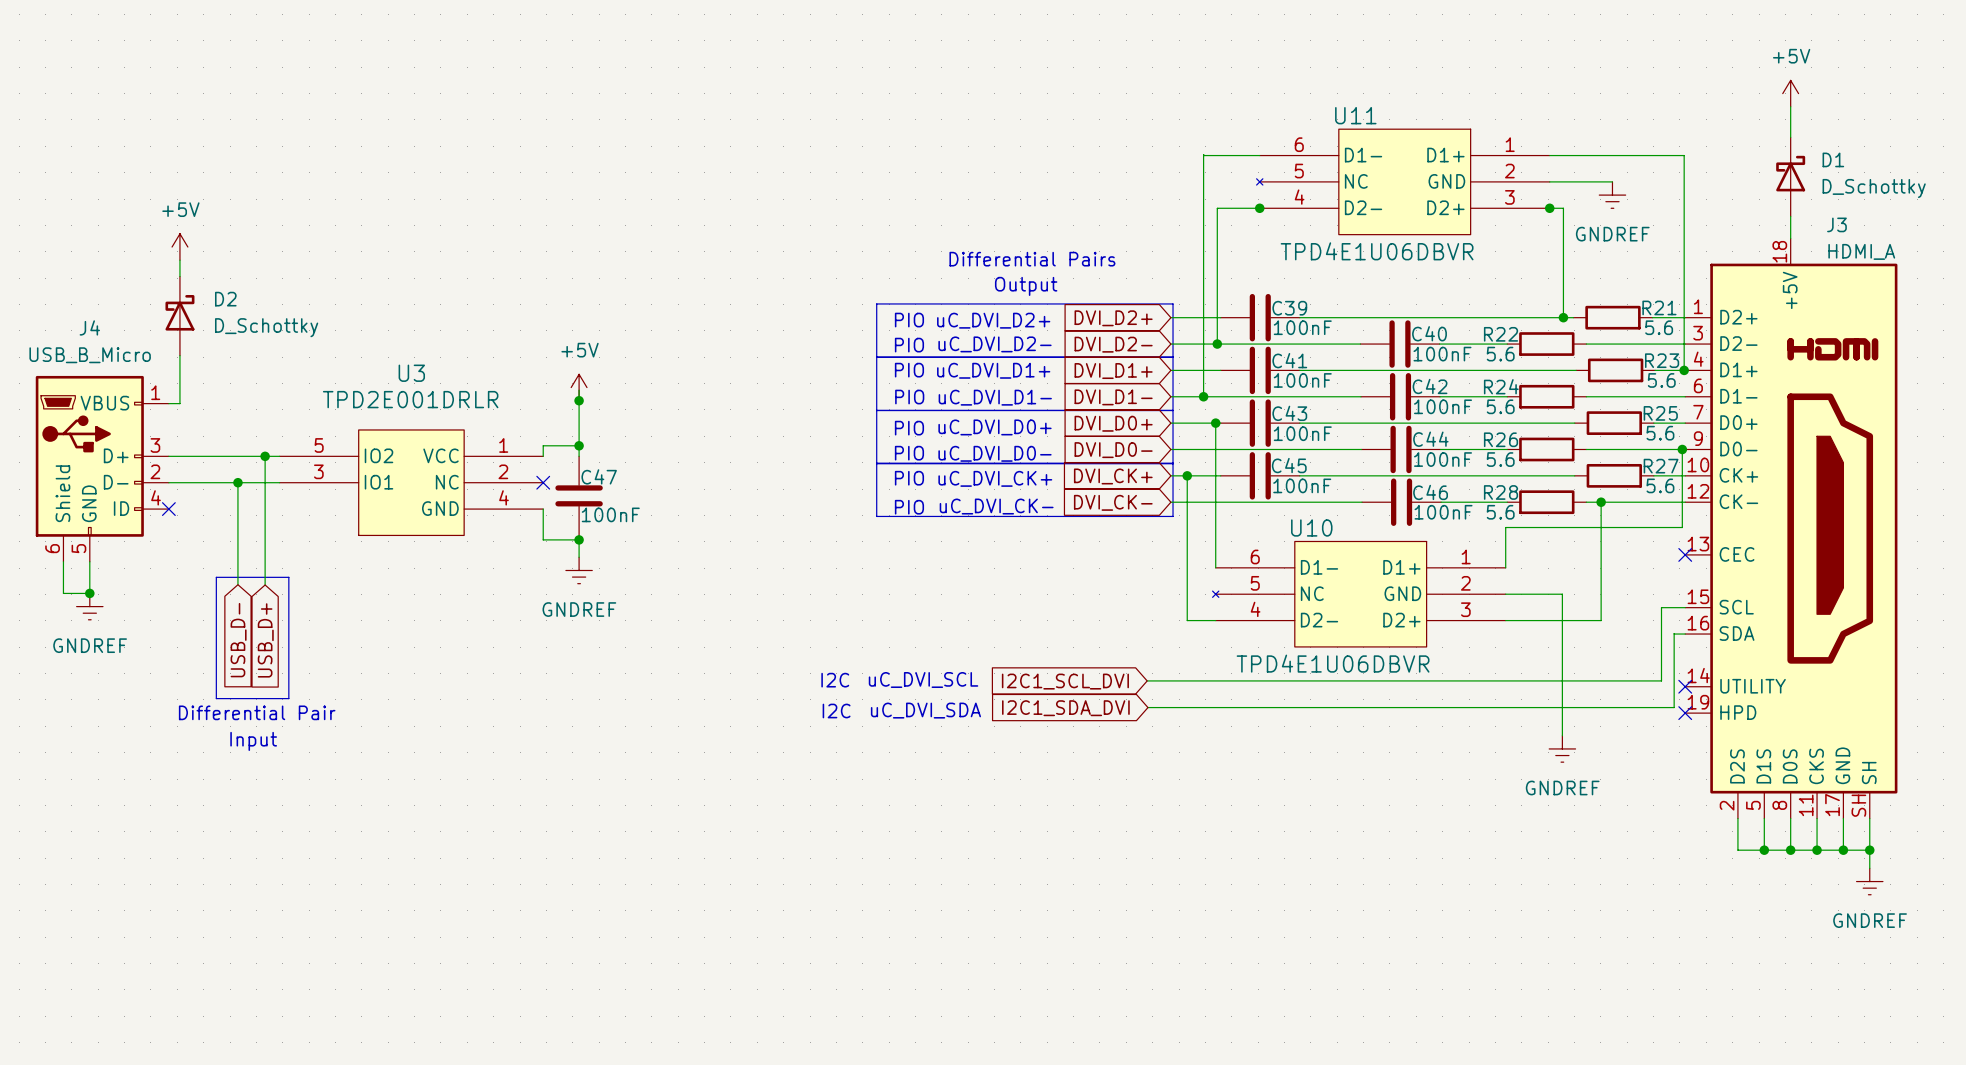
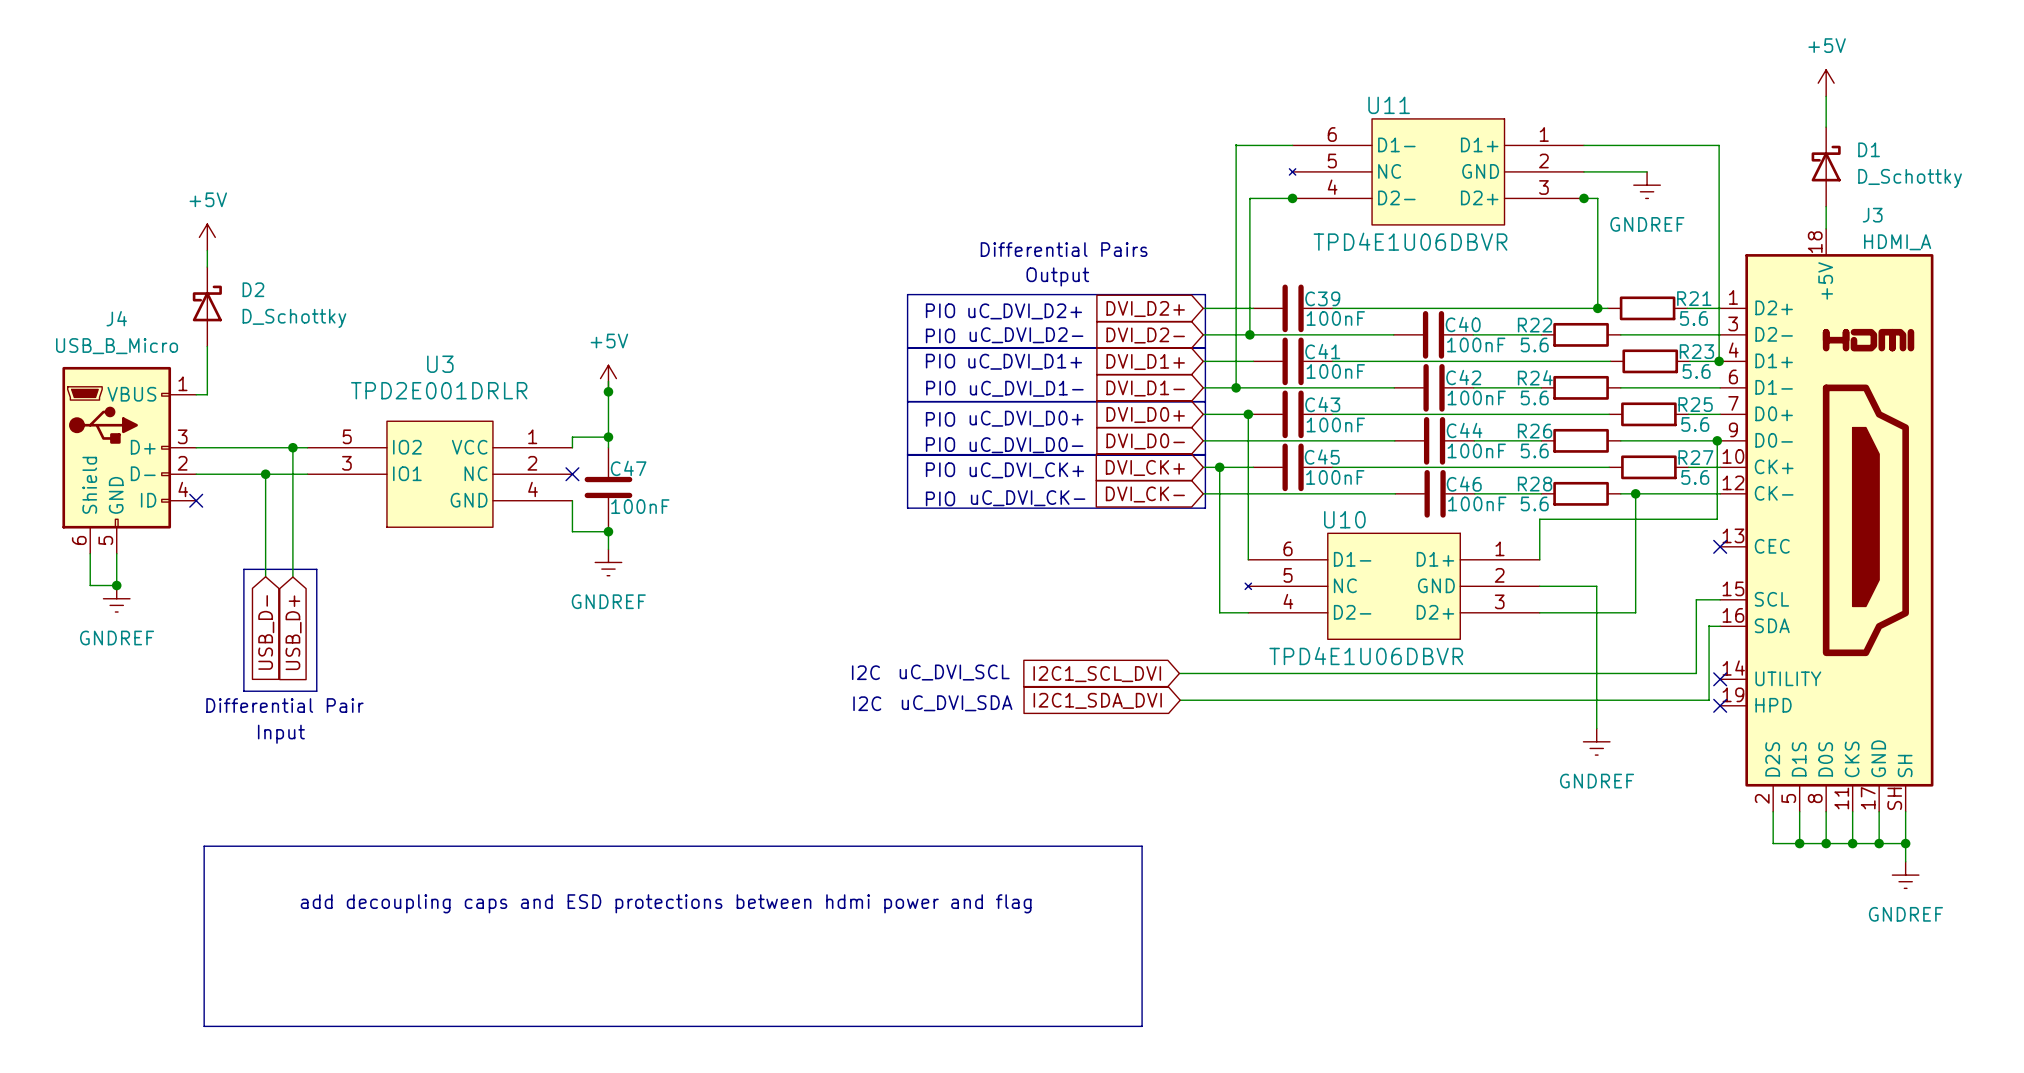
line: none -> (204, 846) (1142, 846) (1142, 1026) (204, 1026) (204, 846)
text: none -> add decoupling caps and ESD protections between hdmi power and flag (666, 903)

